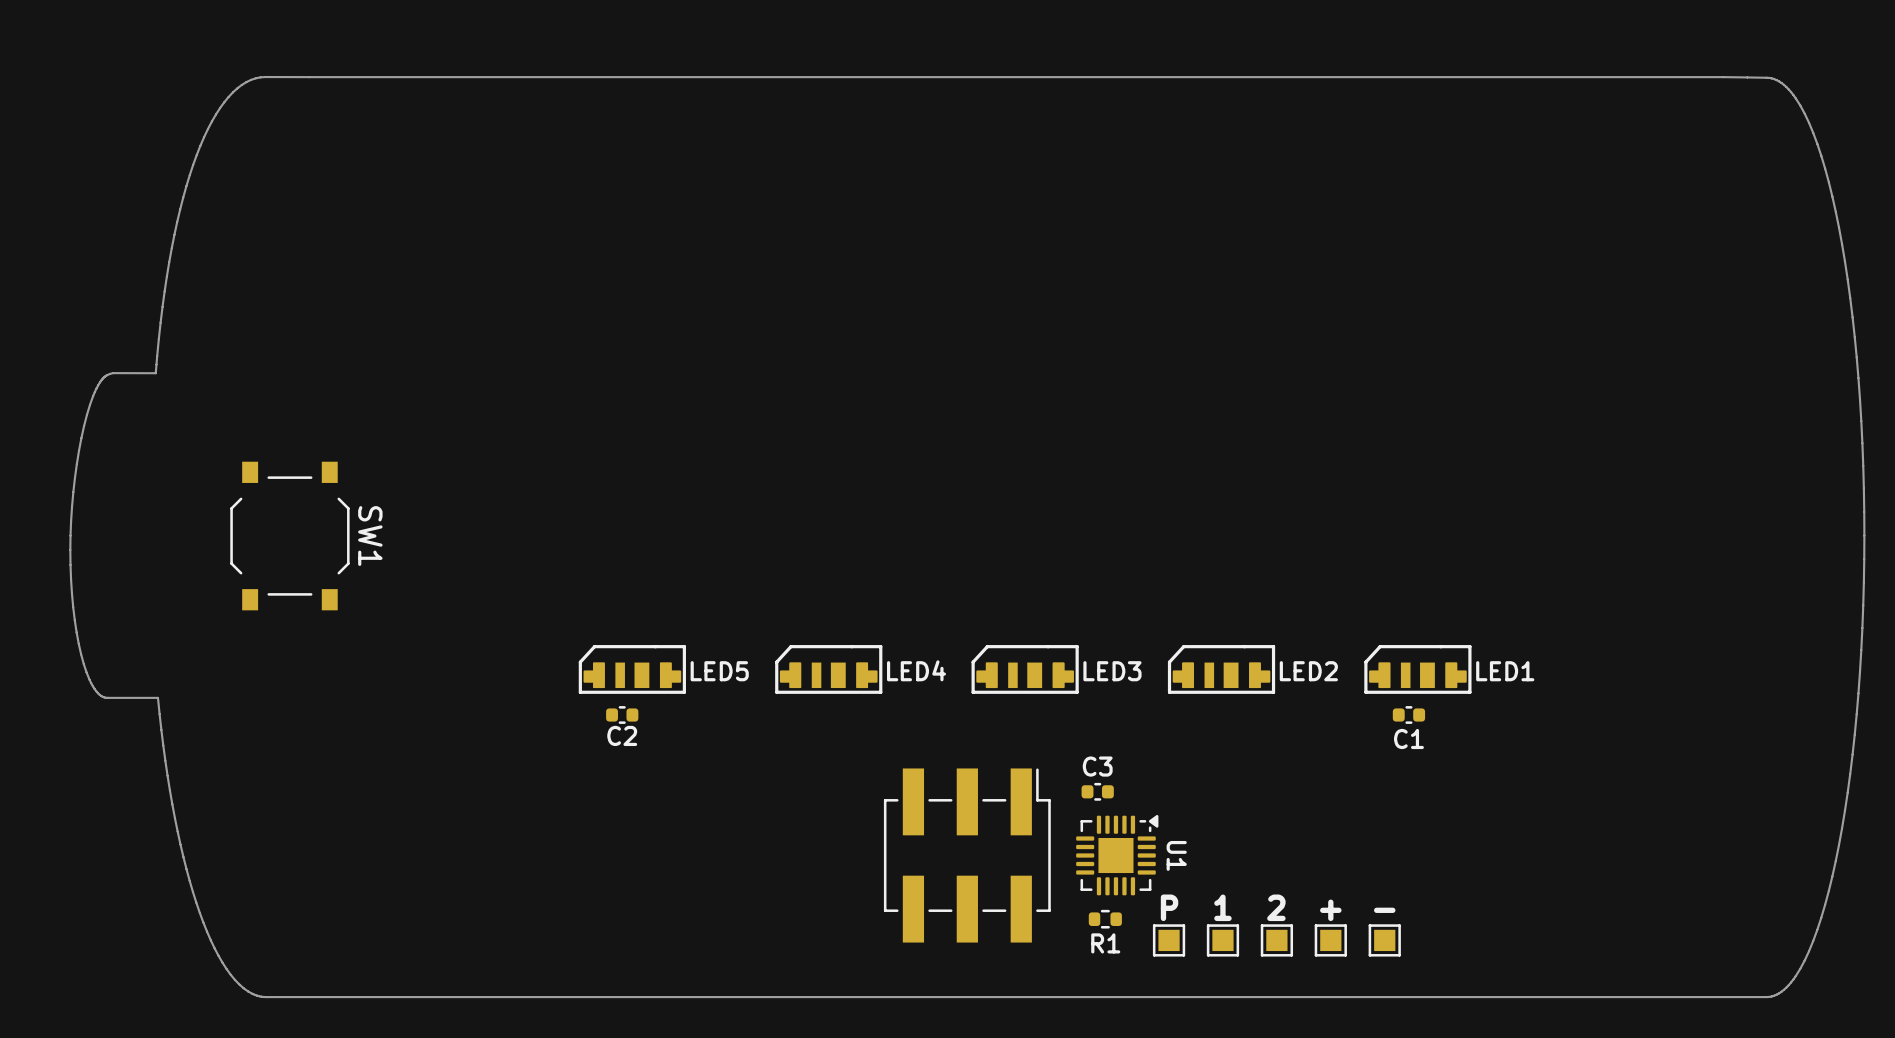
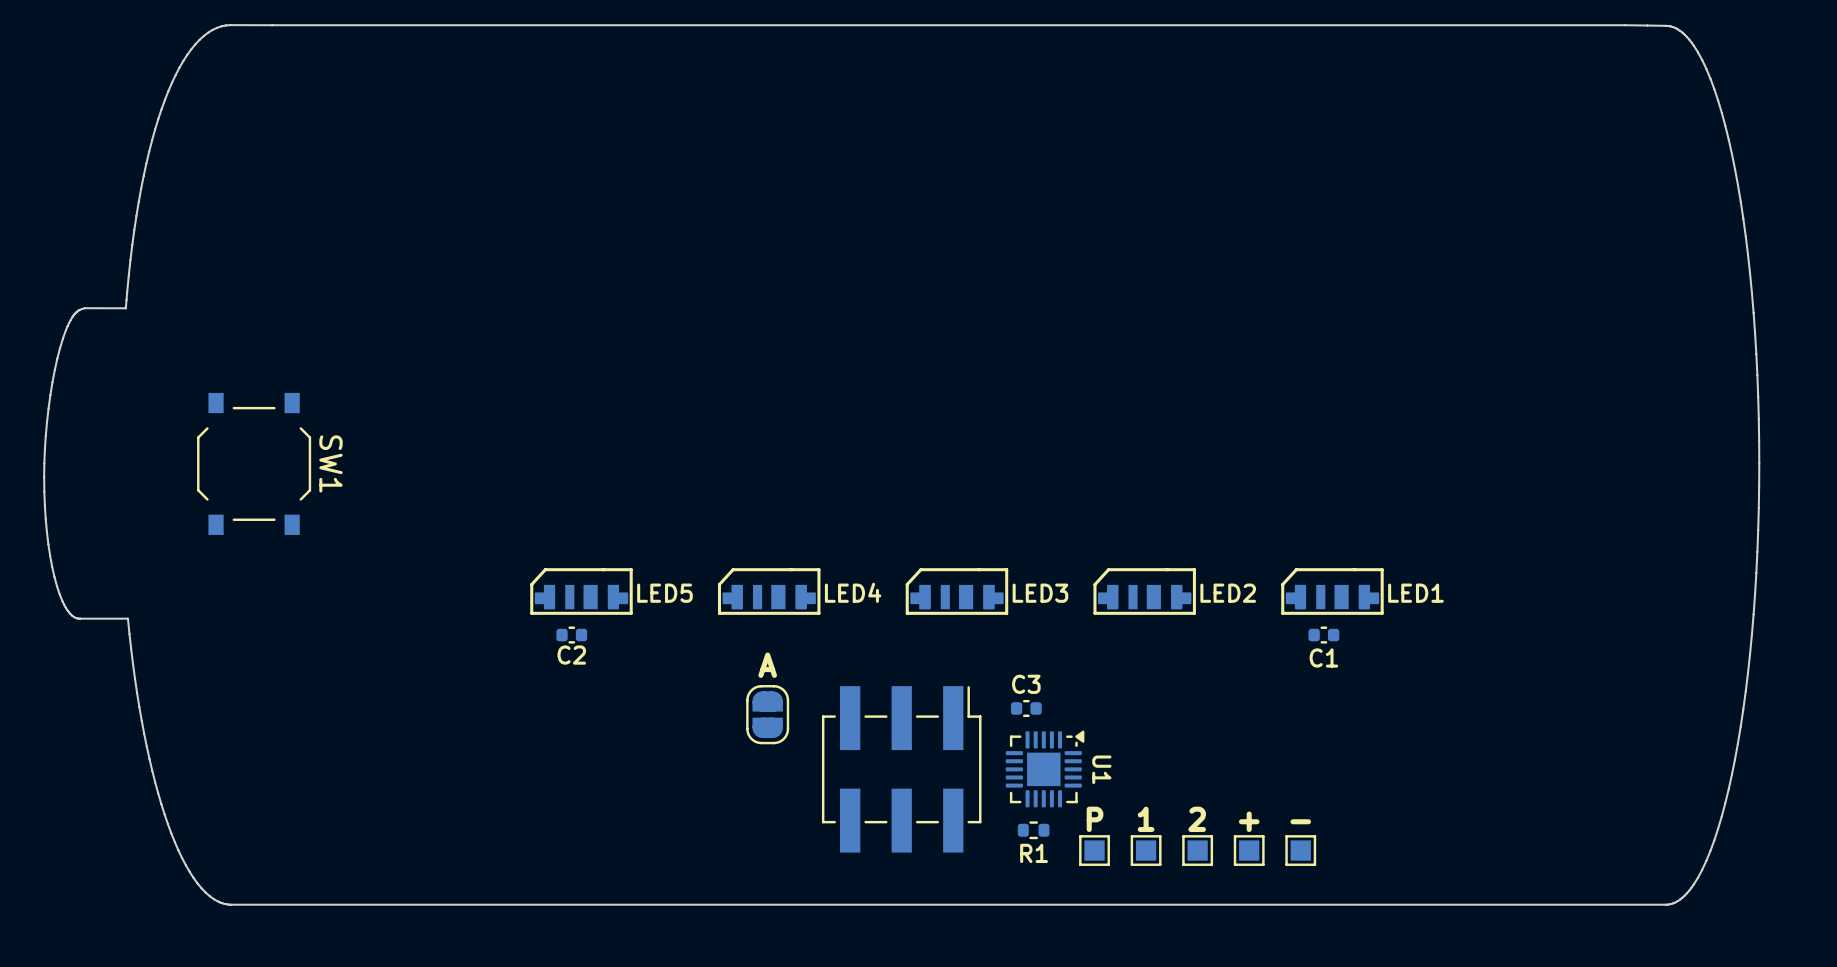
text: none -> A (767, 665)
part: none -> (767, 714)

